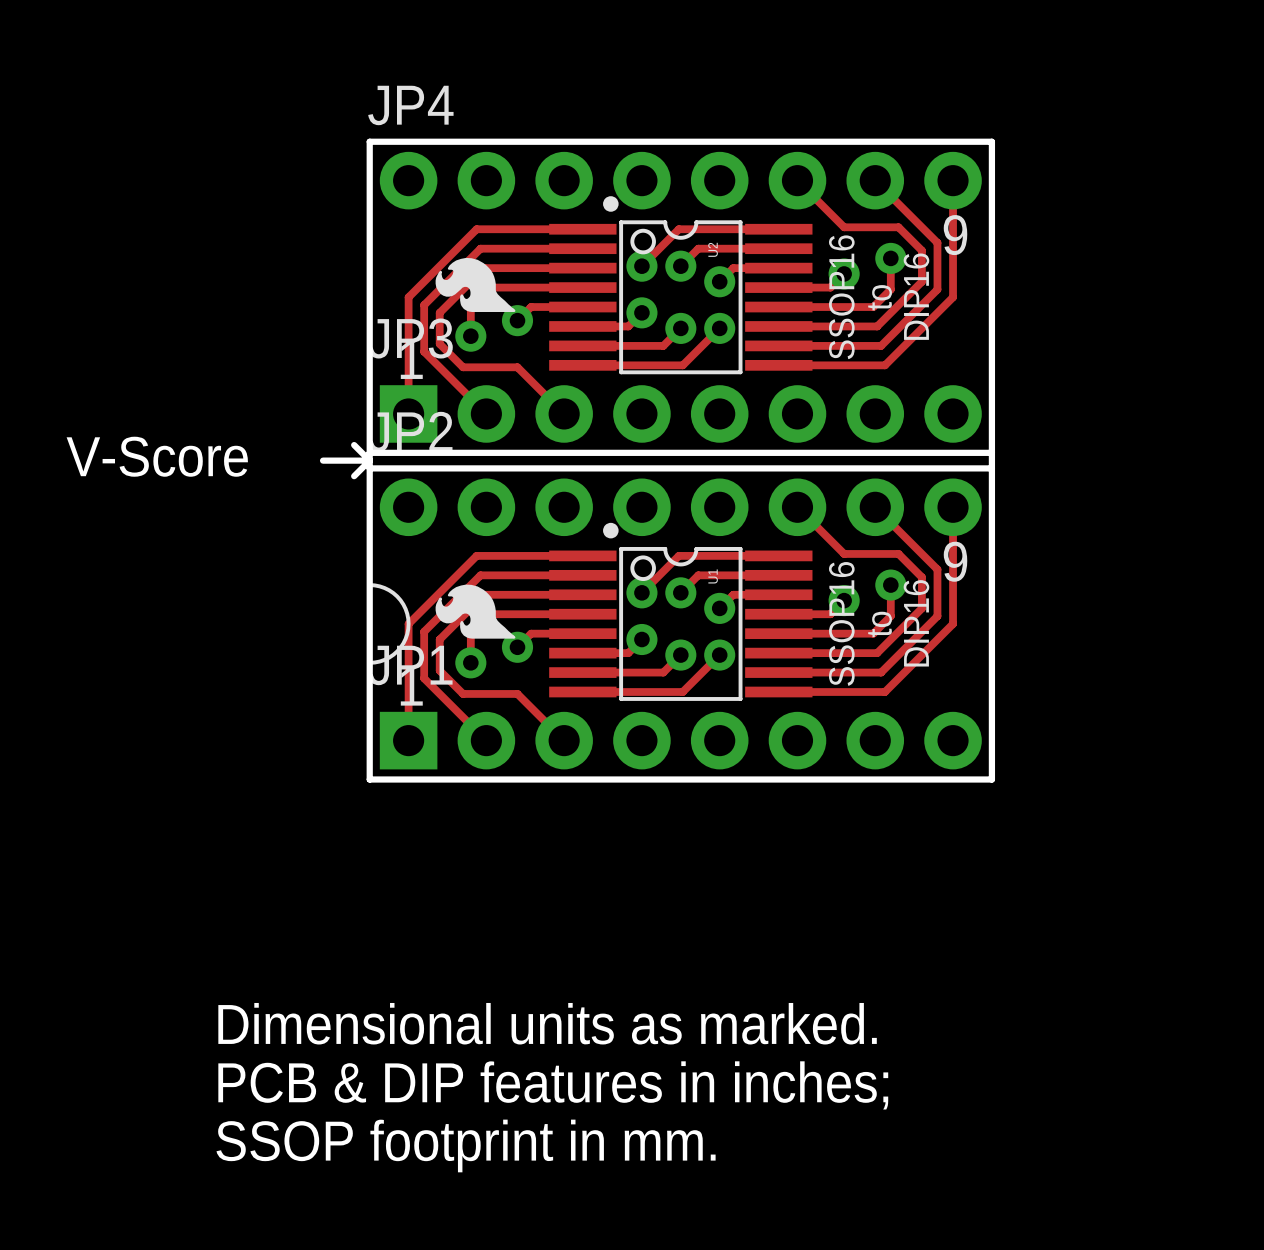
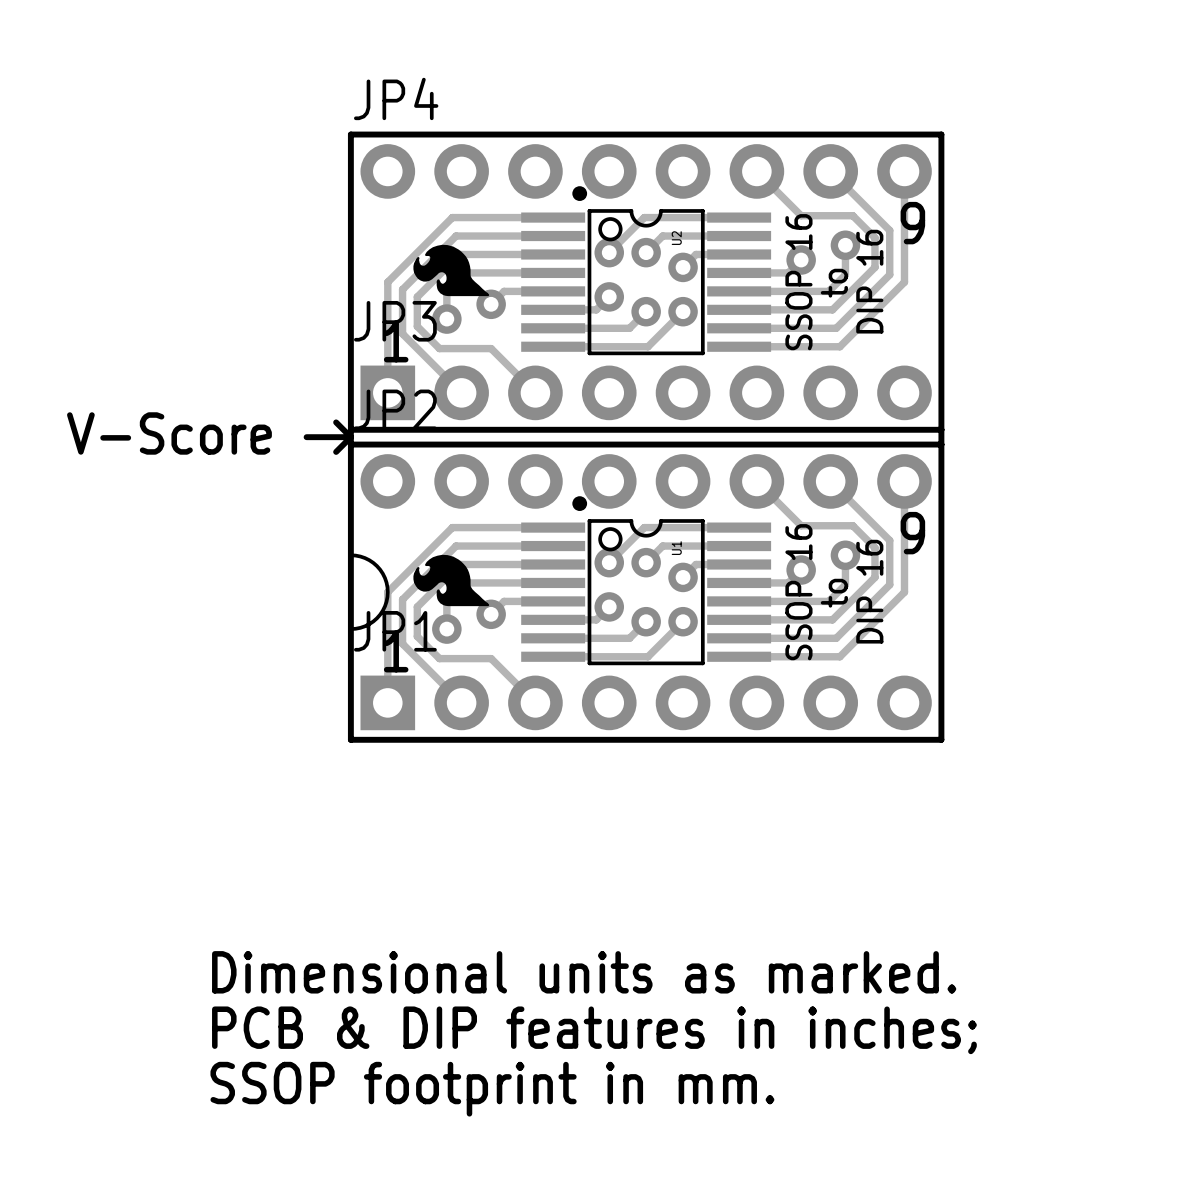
text: DIP16 (916, 296) -> DIP 16 (869, 281)
text: SSOP16 (841, 297) -> SSOP 16 (798, 282)
text: SSOP16 (841, 623) -> SSOP 16 (798, 592)
text: DIP16 (916, 623) -> DIP 16 (869, 591)

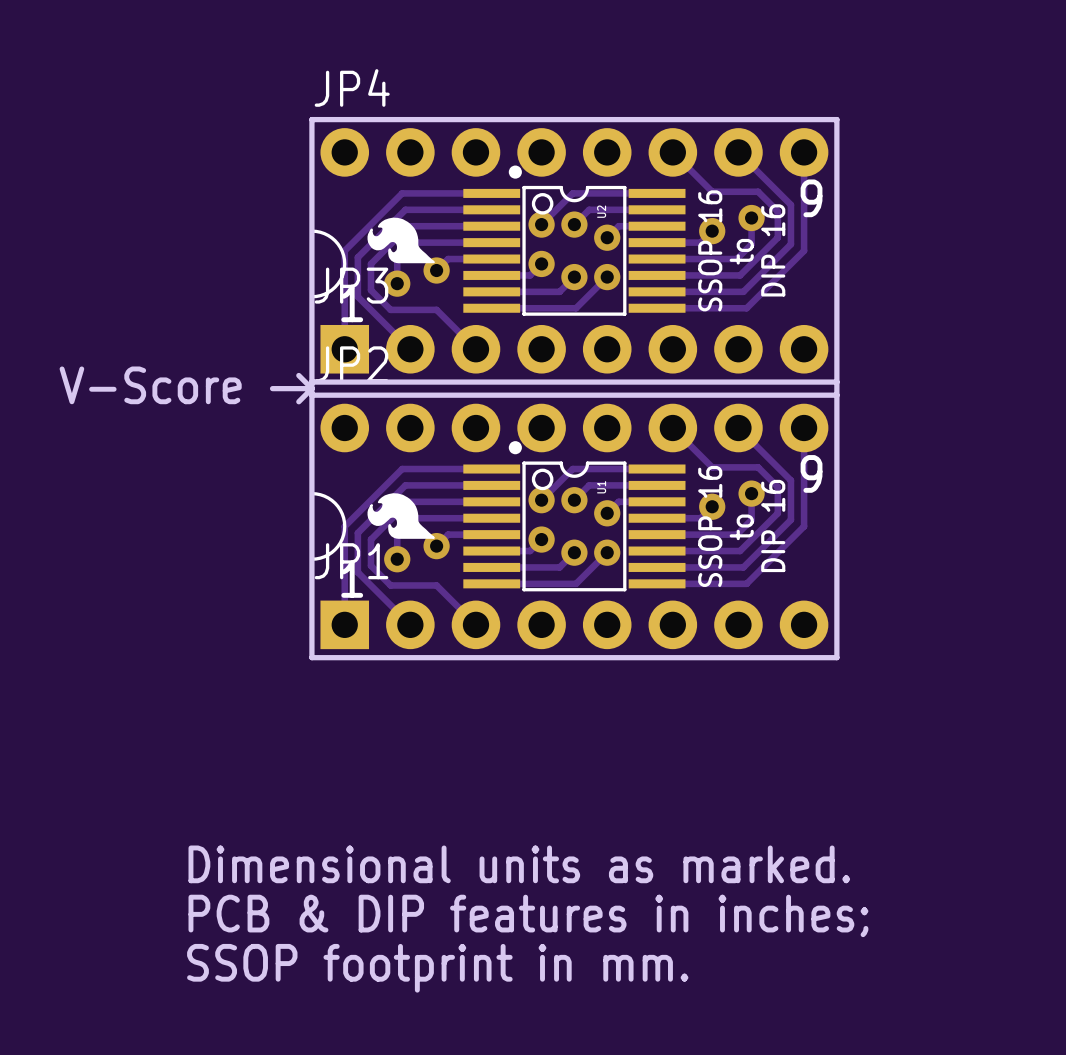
line: none -> (311, 231) (324, 233) (335, 240) (342, 251) (344, 263) (342, 276) (335, 287) (324, 294) (311, 296)

